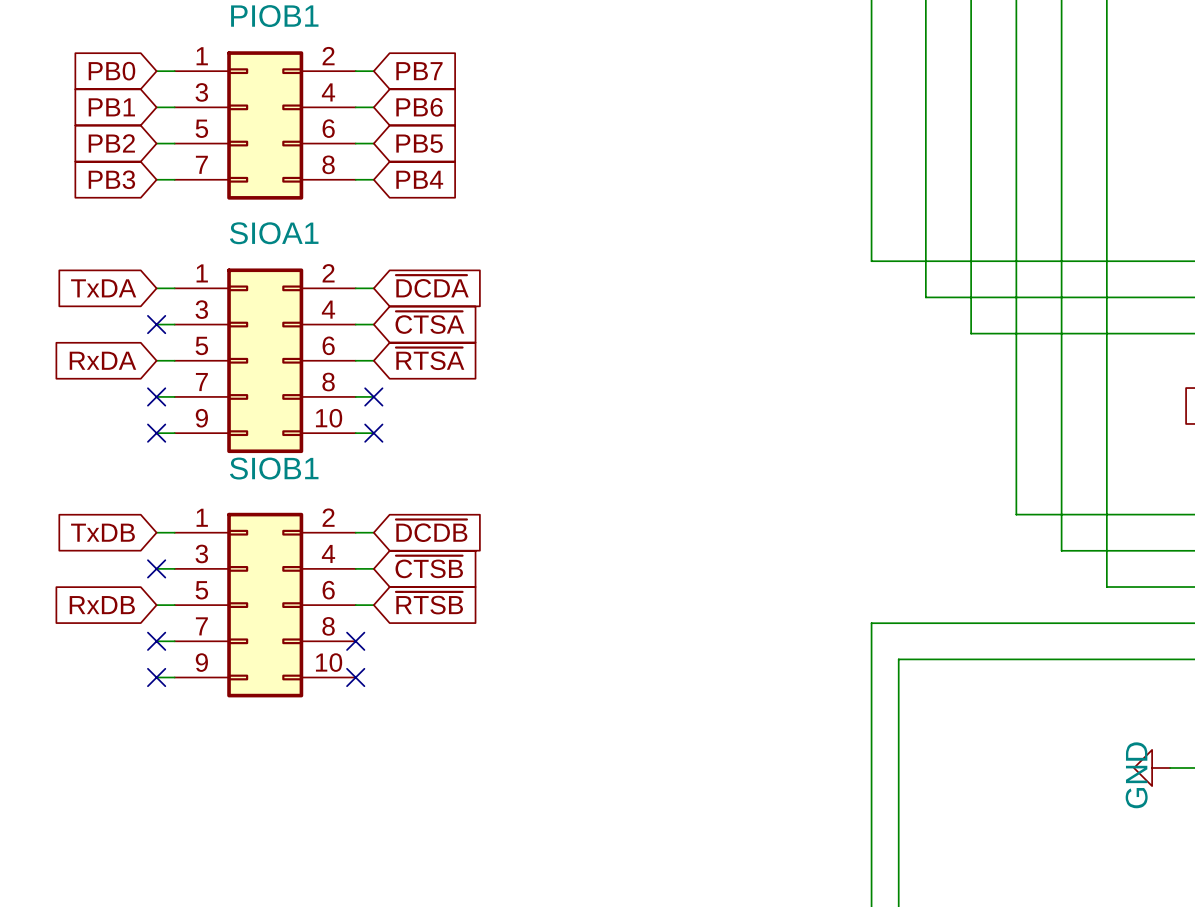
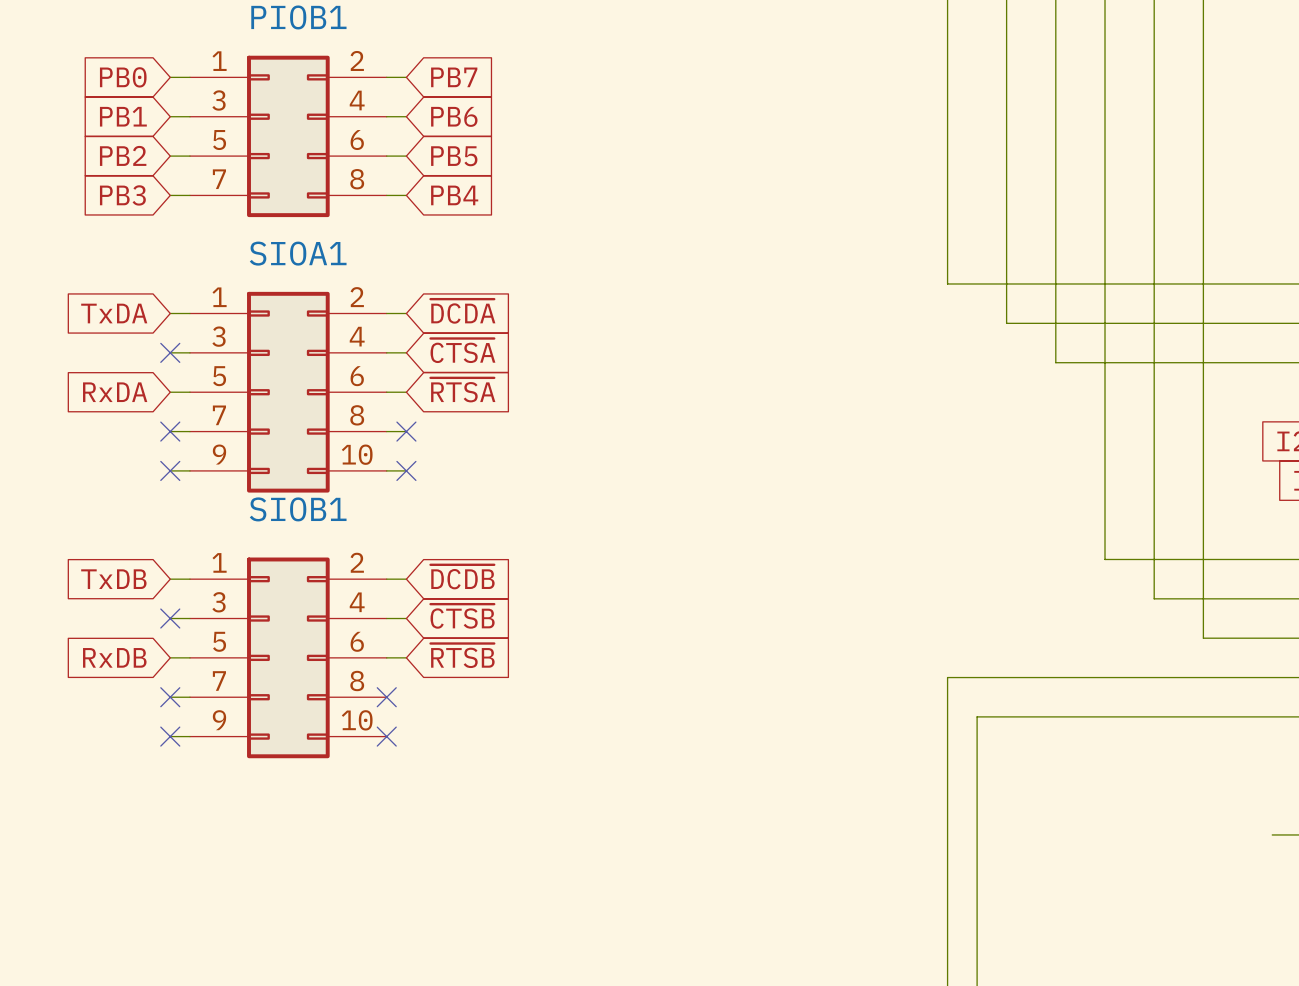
power symbol: GND (1152, 767) -> none

